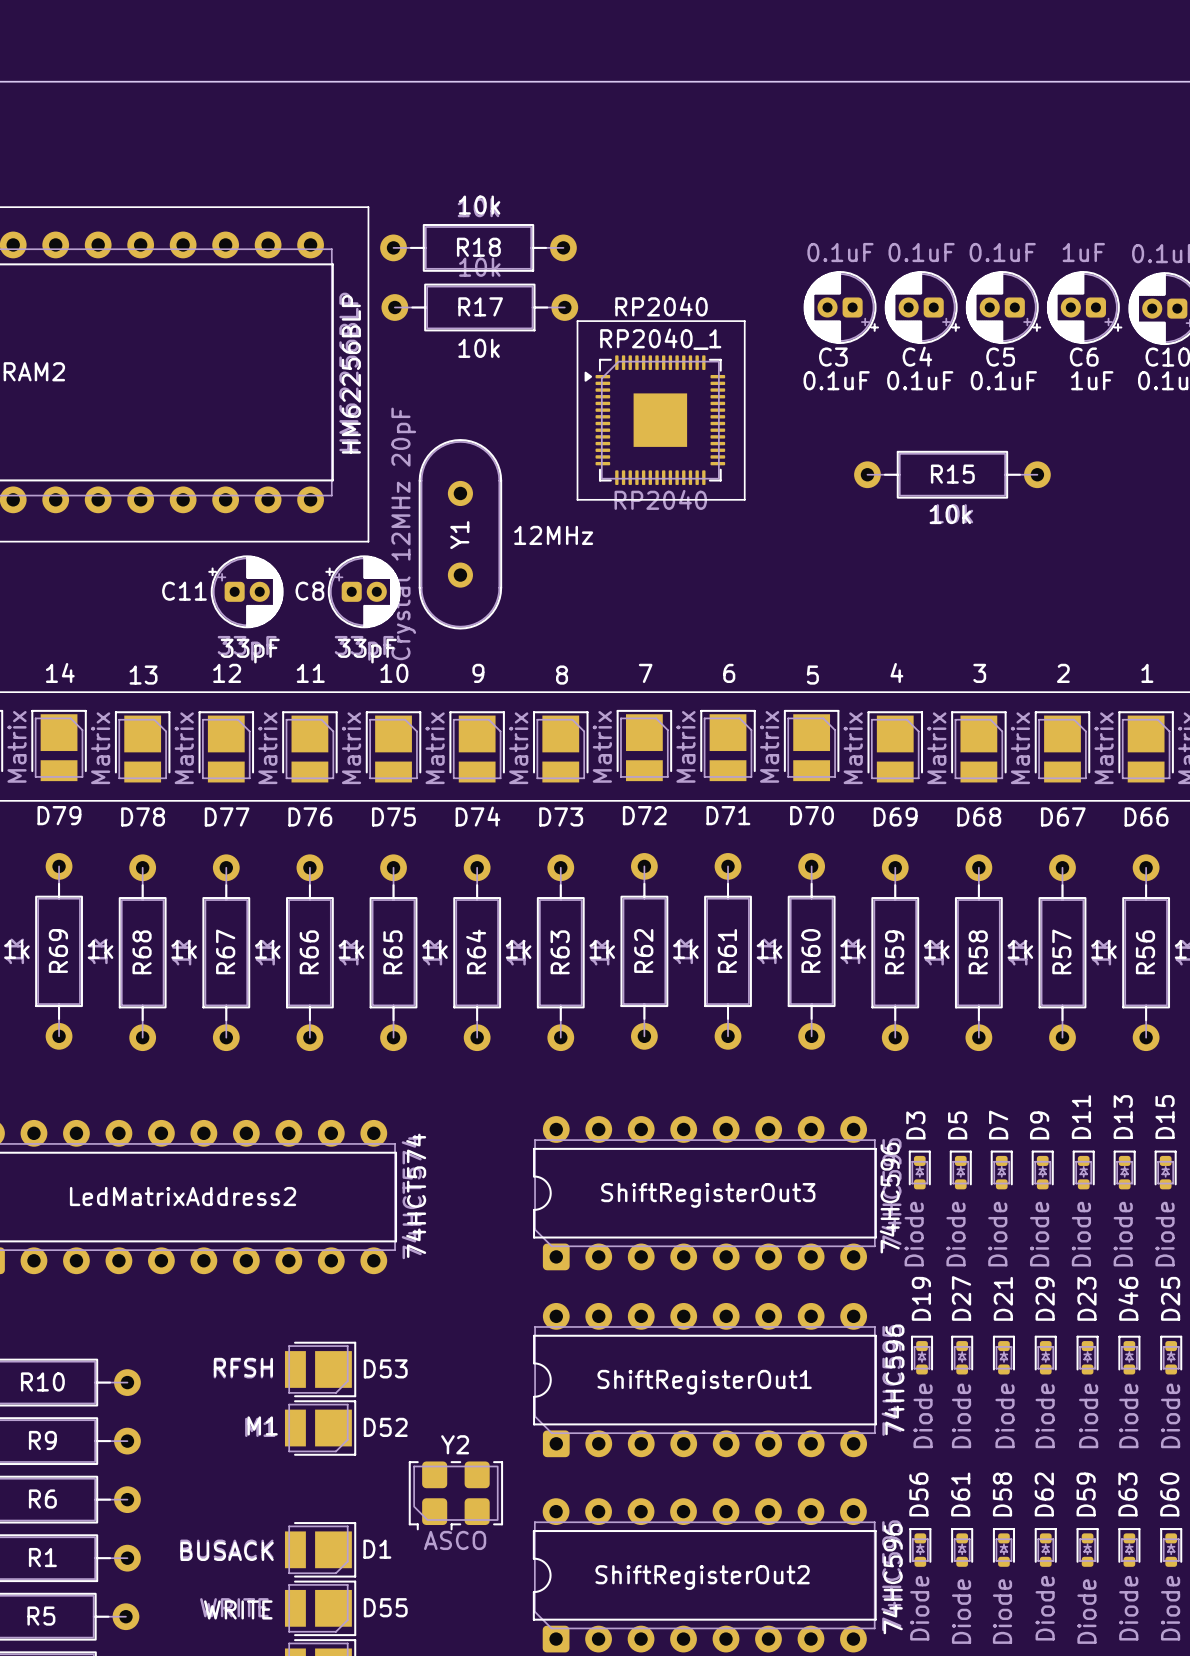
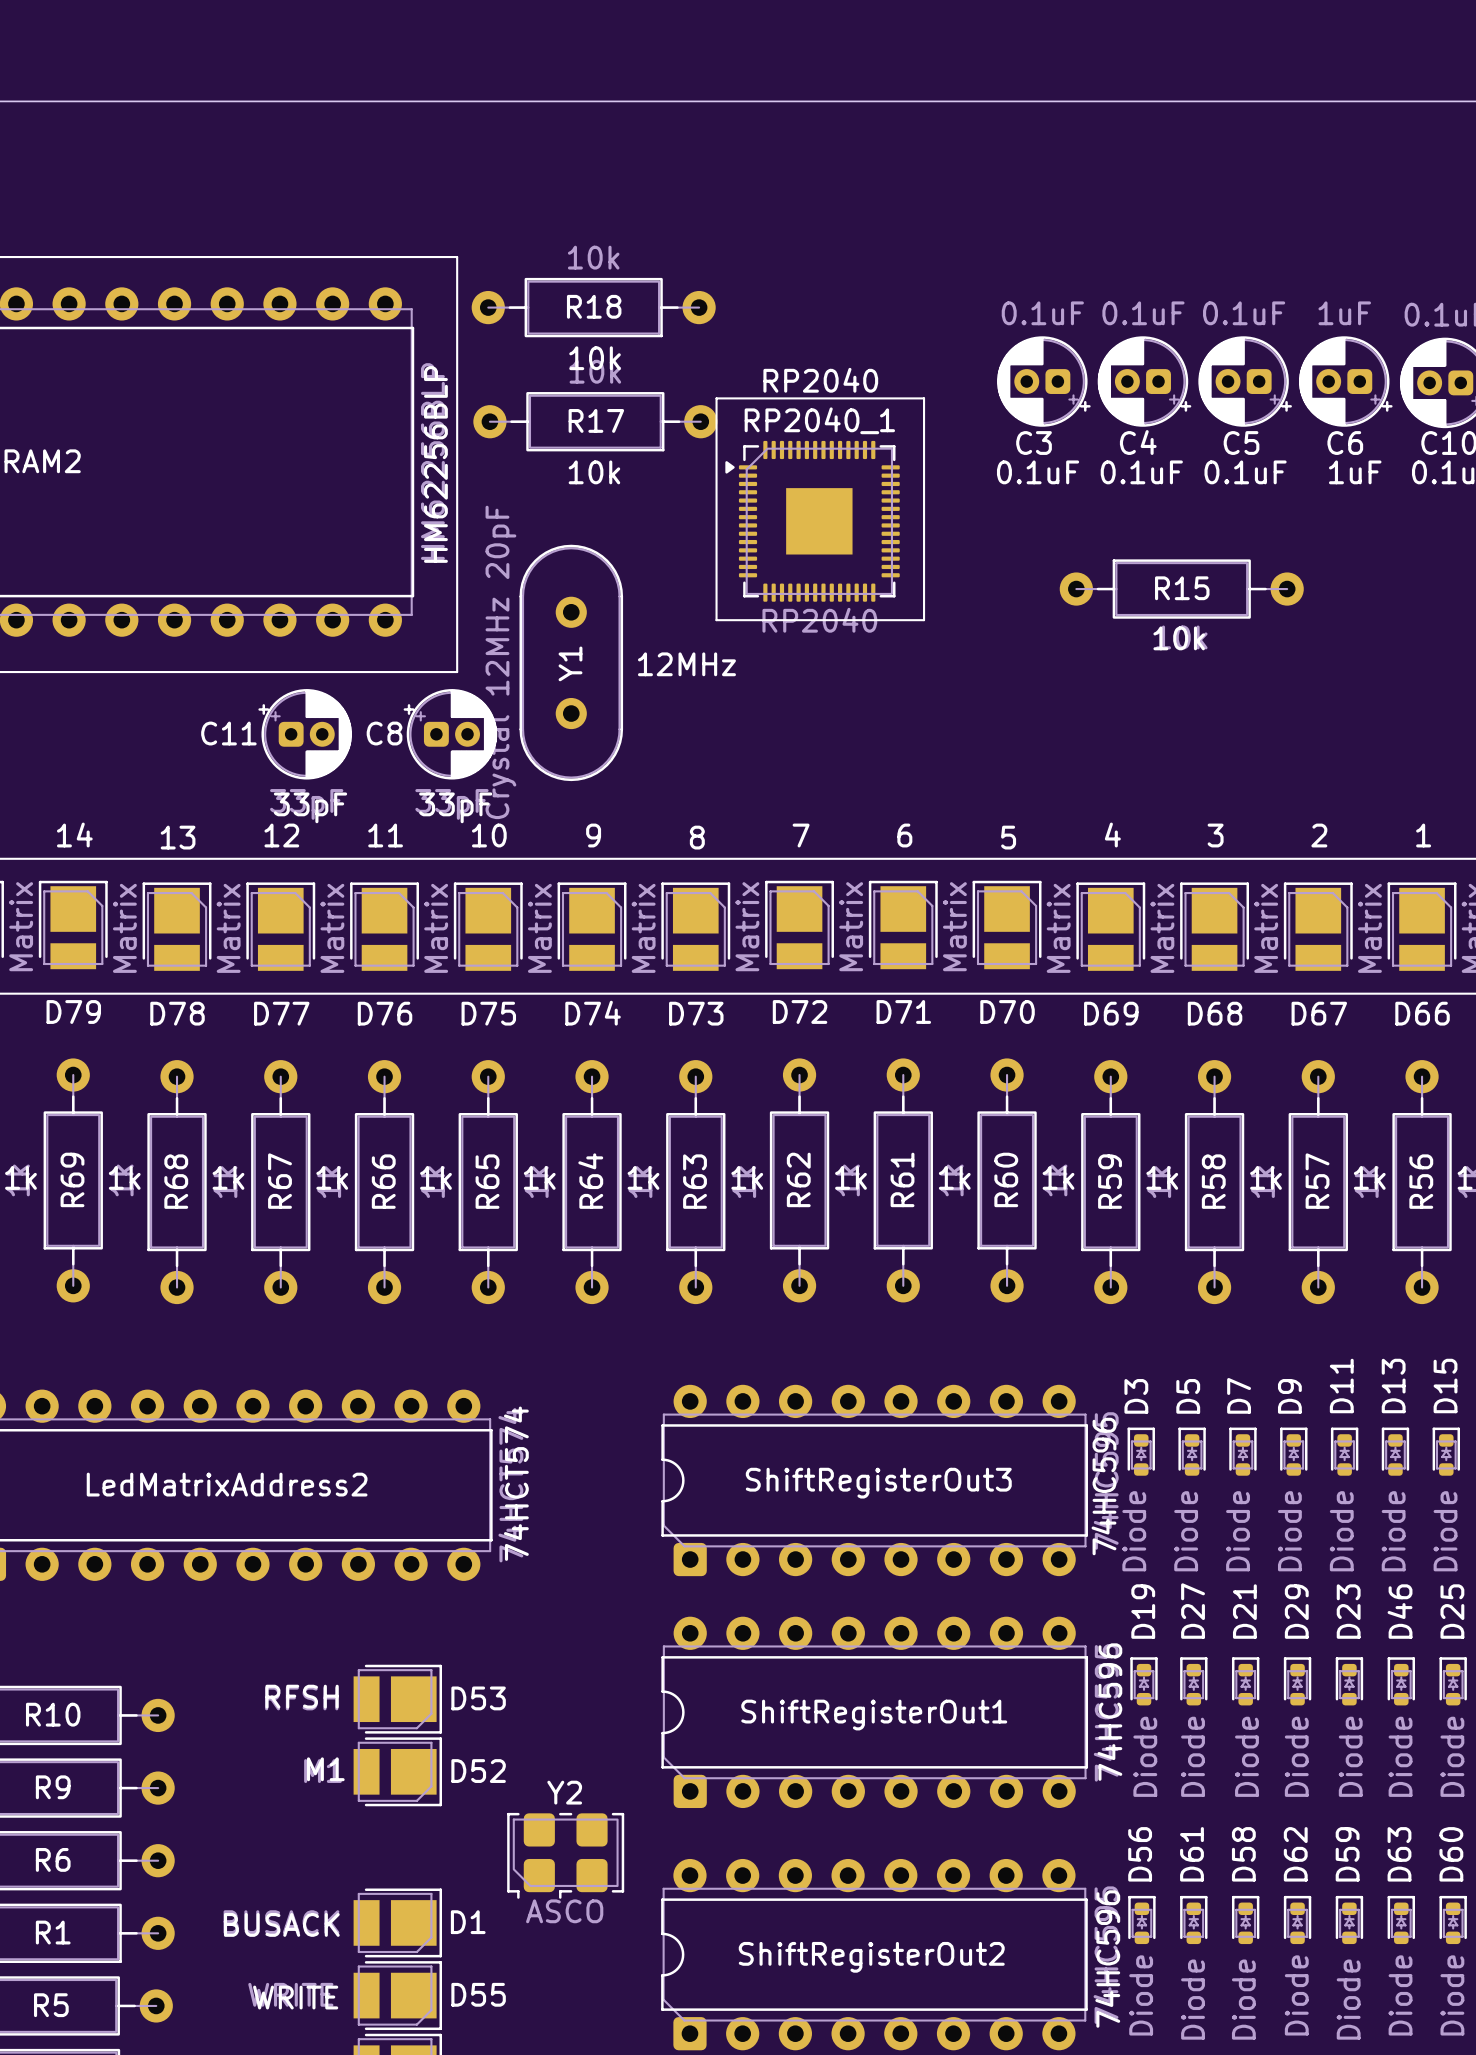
text: 10k (479, 205) -> none
text: none -> 10k (595, 358)
R17 position: (479, 307) -> (595, 421)
text position: 10k (479, 348) -> 10k (594, 472)

